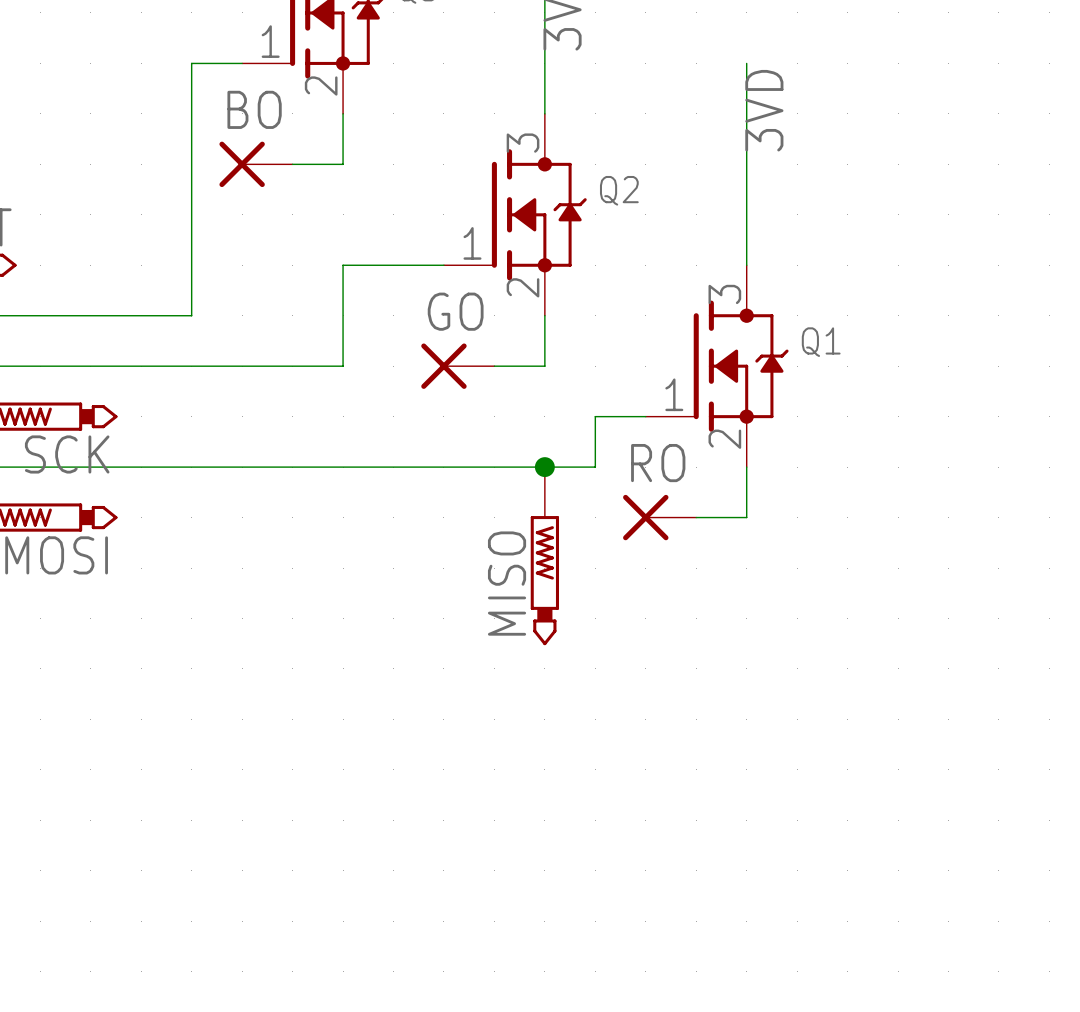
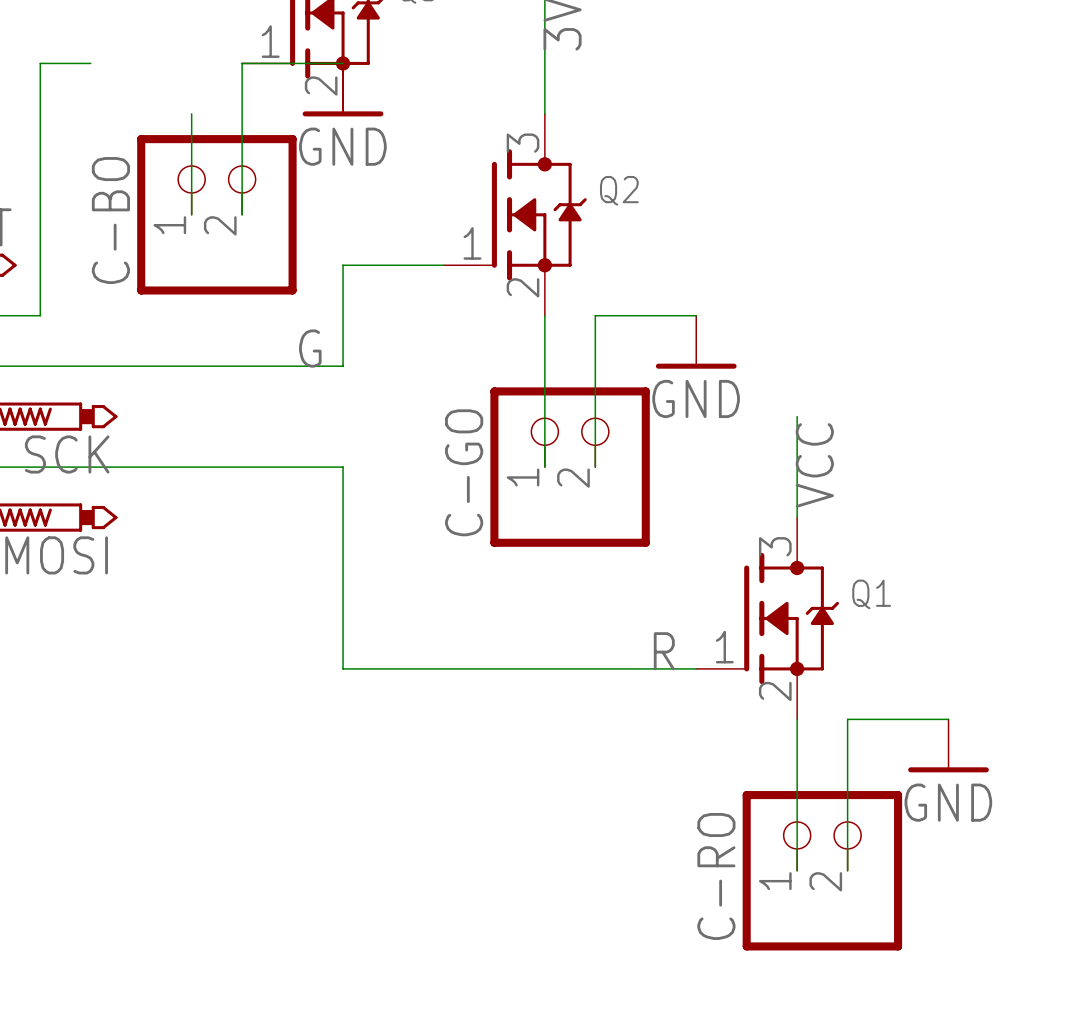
wire: (242, 63) (191, 63) (191, 113) -> none
wire: none -> (343, 63) (242, 63) (242, 214)
wire: (746, 63) (746, 265) -> none
power symbol: none -> GND (343, 89)
label: 3VD (764, 110) -> none
wire: (343, 113) (343, 164) (292, 164) -> none
BO: (256, 164) -> none
wire: (191, 214) (191, 315) (40, 315) -> (90, 63) (40, 63) (40, 315)
C-BO: none -> (216, 214)
power symbol: none -> GND (696, 342)
label: none -> G (310, 348)
GO: (457, 366) -> none
wire: (494, 366) (544, 366) -> (544, 467) (544, 366)
Q1 position: (717, 366) -> (767, 618)
wire: (595, 416) (645, 416) -> (595, 416) (595, 315) (696, 315)
wire: none -> (797, 416) (797, 517)
label: none -> VCC (814, 465)
wire: (343, 467) (595, 467) -> (343, 467) (343, 668) (696, 668)
junction: (544, 467) -> none
C-GO: none -> (570, 467)
wire: (746, 467) (746, 517) (696, 517) -> none
RO: (659, 517) -> none
MISO: (544, 556) -> none
label: none -> R (664, 651)
wire: none -> (797, 719) (797, 870)
wire: none -> (948, 719) (847, 719) (847, 870)
power symbol: none -> GND (948, 745)
C-RO: none -> (822, 870)

